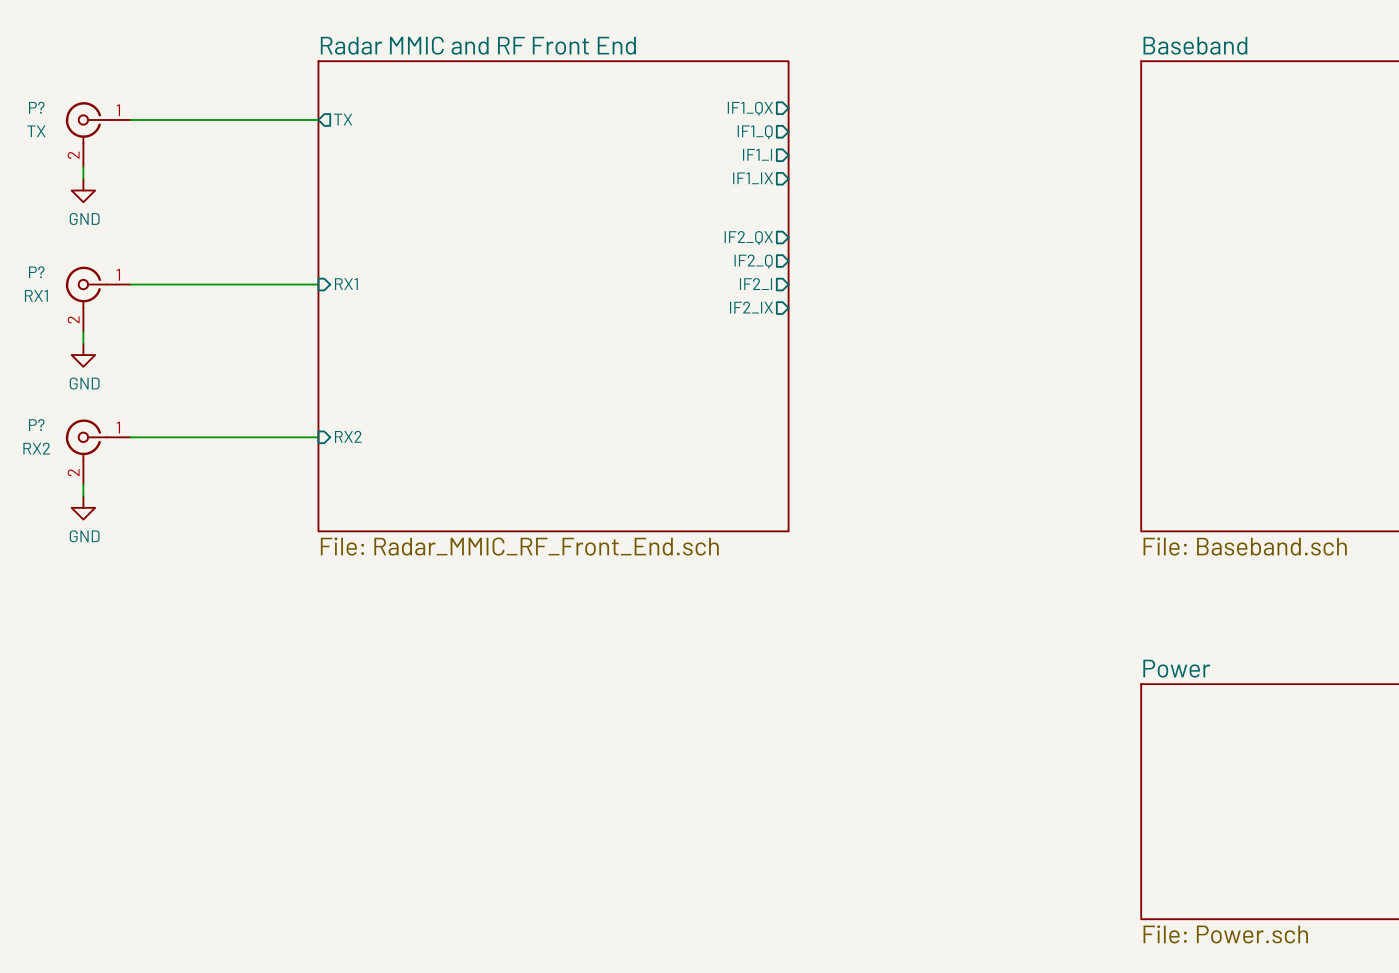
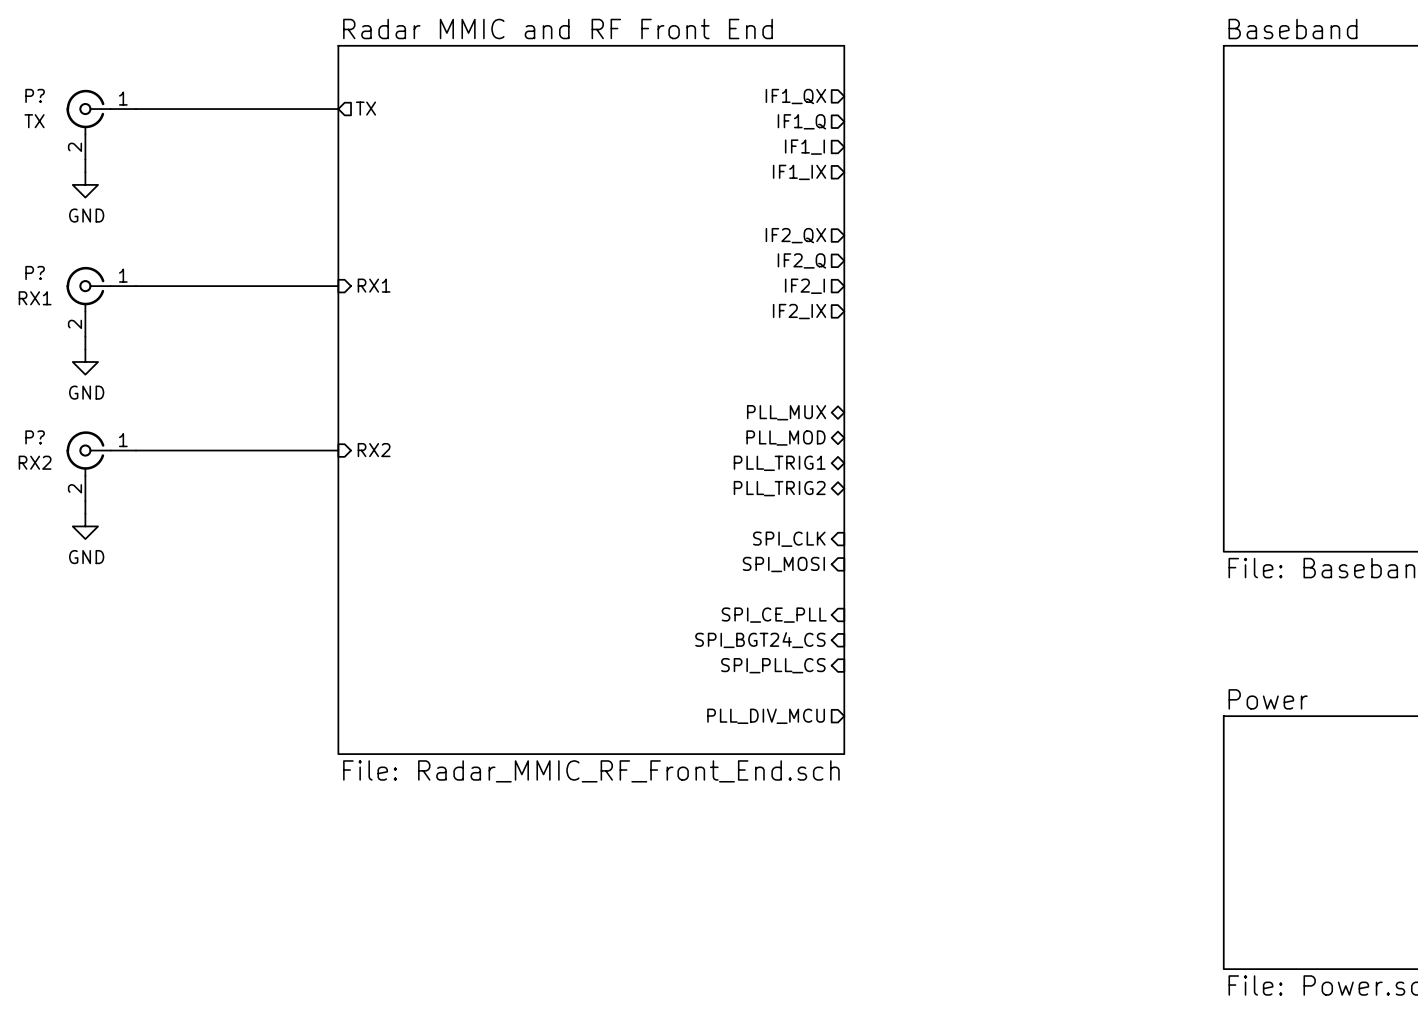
sheet Radar MMIC and RF Front End: File: Radar_MMIC_RF_Front_End.sch (553, 296) -> none
sheet Radar MMIC and RF Front End: none -> File: Radar_MMIC_RF_Front_End.sch (591, 399)
sheet pin: none -> PLL_MUX (786, 412)
sheet pin: none -> PLL_MOD (785, 438)
sheet pin: none -> PLL_TRIG1 (779, 463)
sheet pin: none -> PLL_TRIG2 (779, 488)
sheet pin: none -> SPI_CLK (789, 539)
sheet pin: none -> SPI_MOSI (783, 564)
sheet pin: none -> SPI_CE_PLL (774, 615)
sheet pin: none -> SPI_BGT24_CS (760, 640)
sheet pin: none -> SPI_PLL_CS (773, 665)
sheet pin: none -> PLL_DIV_MCU (766, 716)

